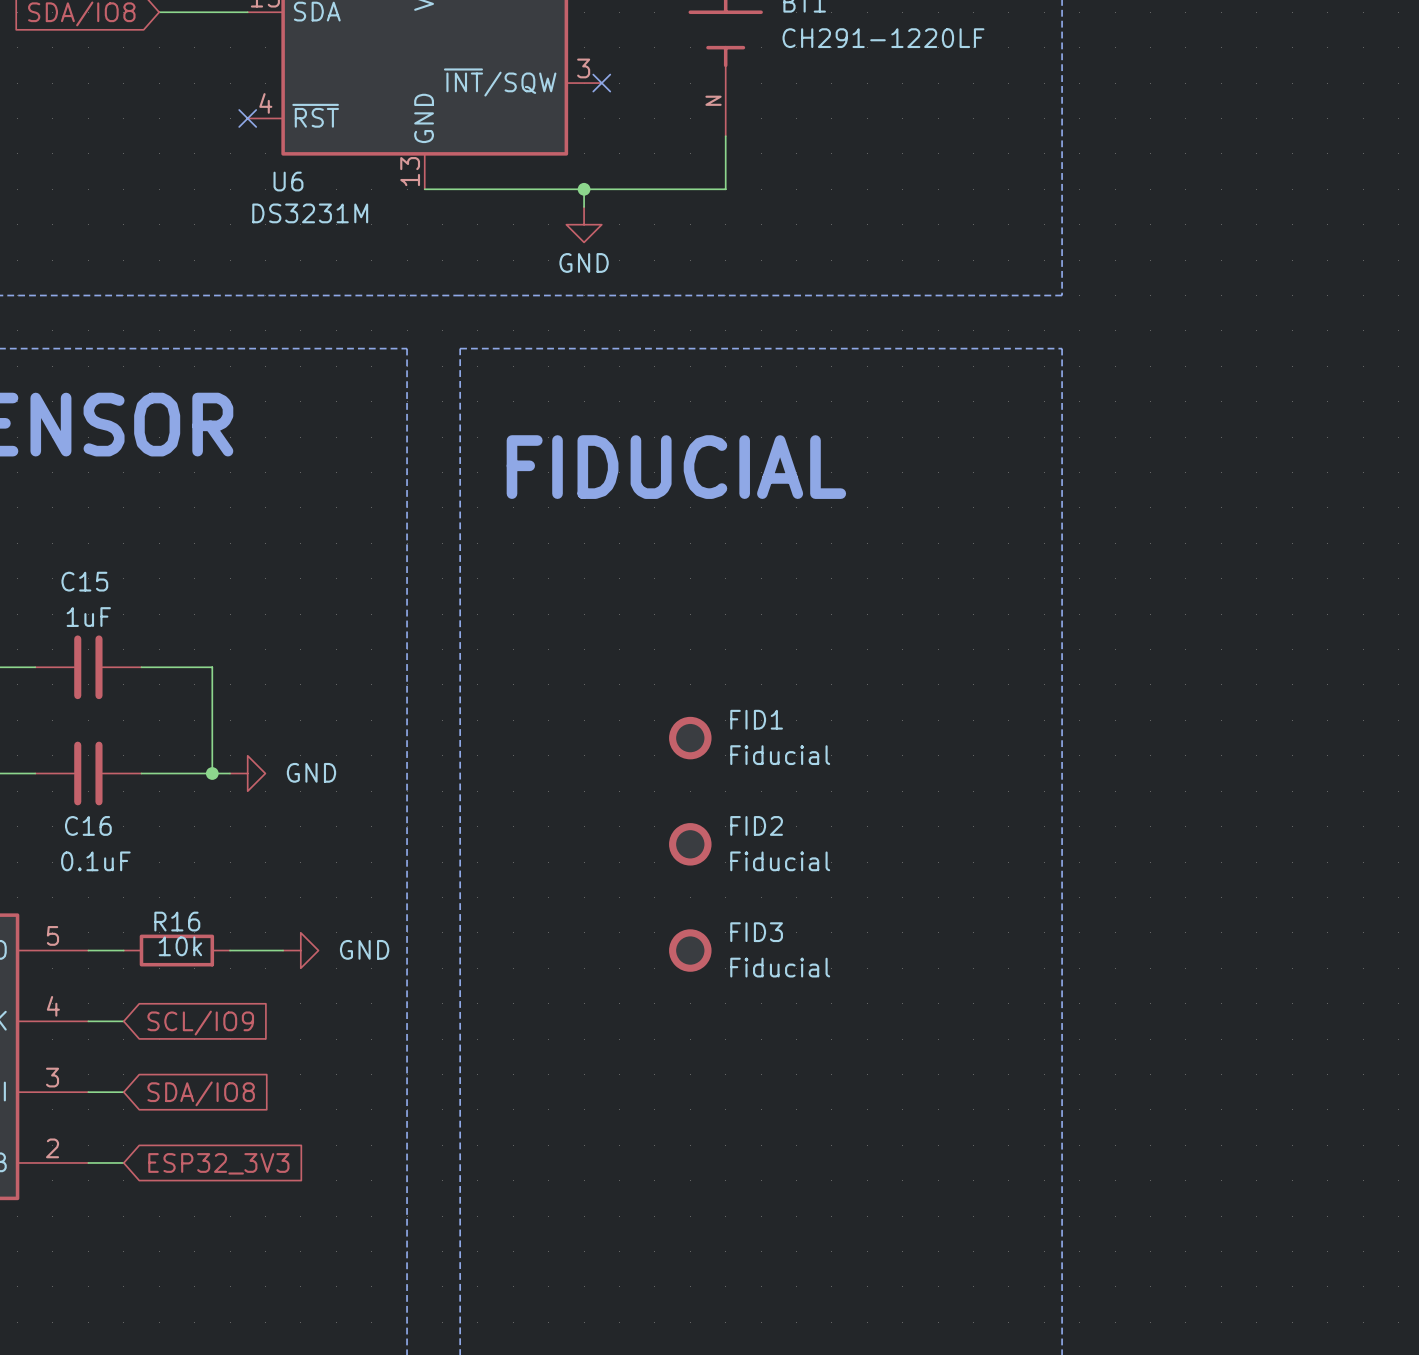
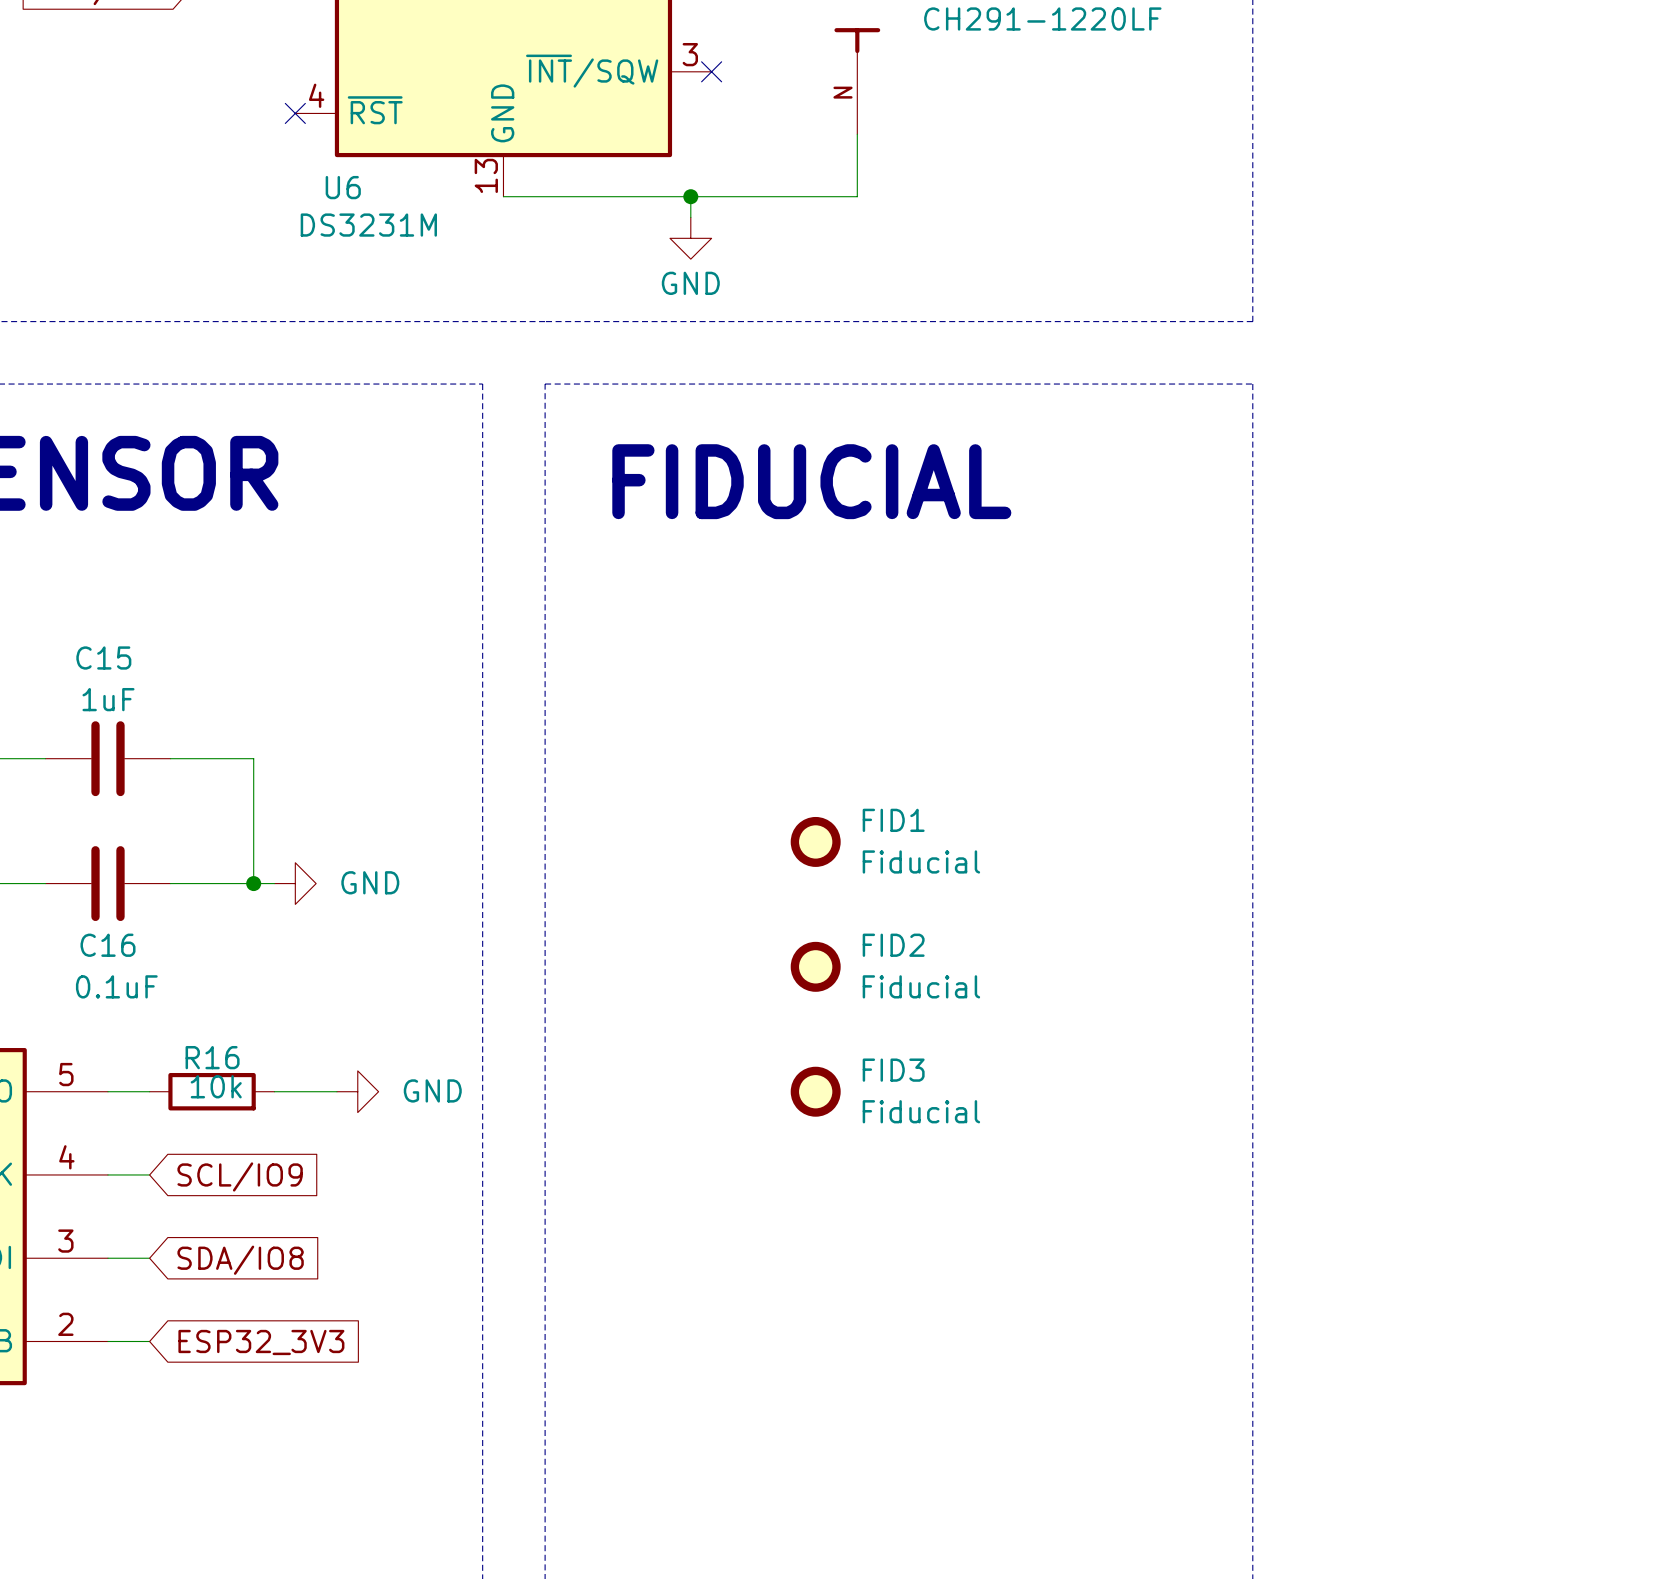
text position: FIDUCIAL (676, 467) -> FIDUCIAL (811, 481)

